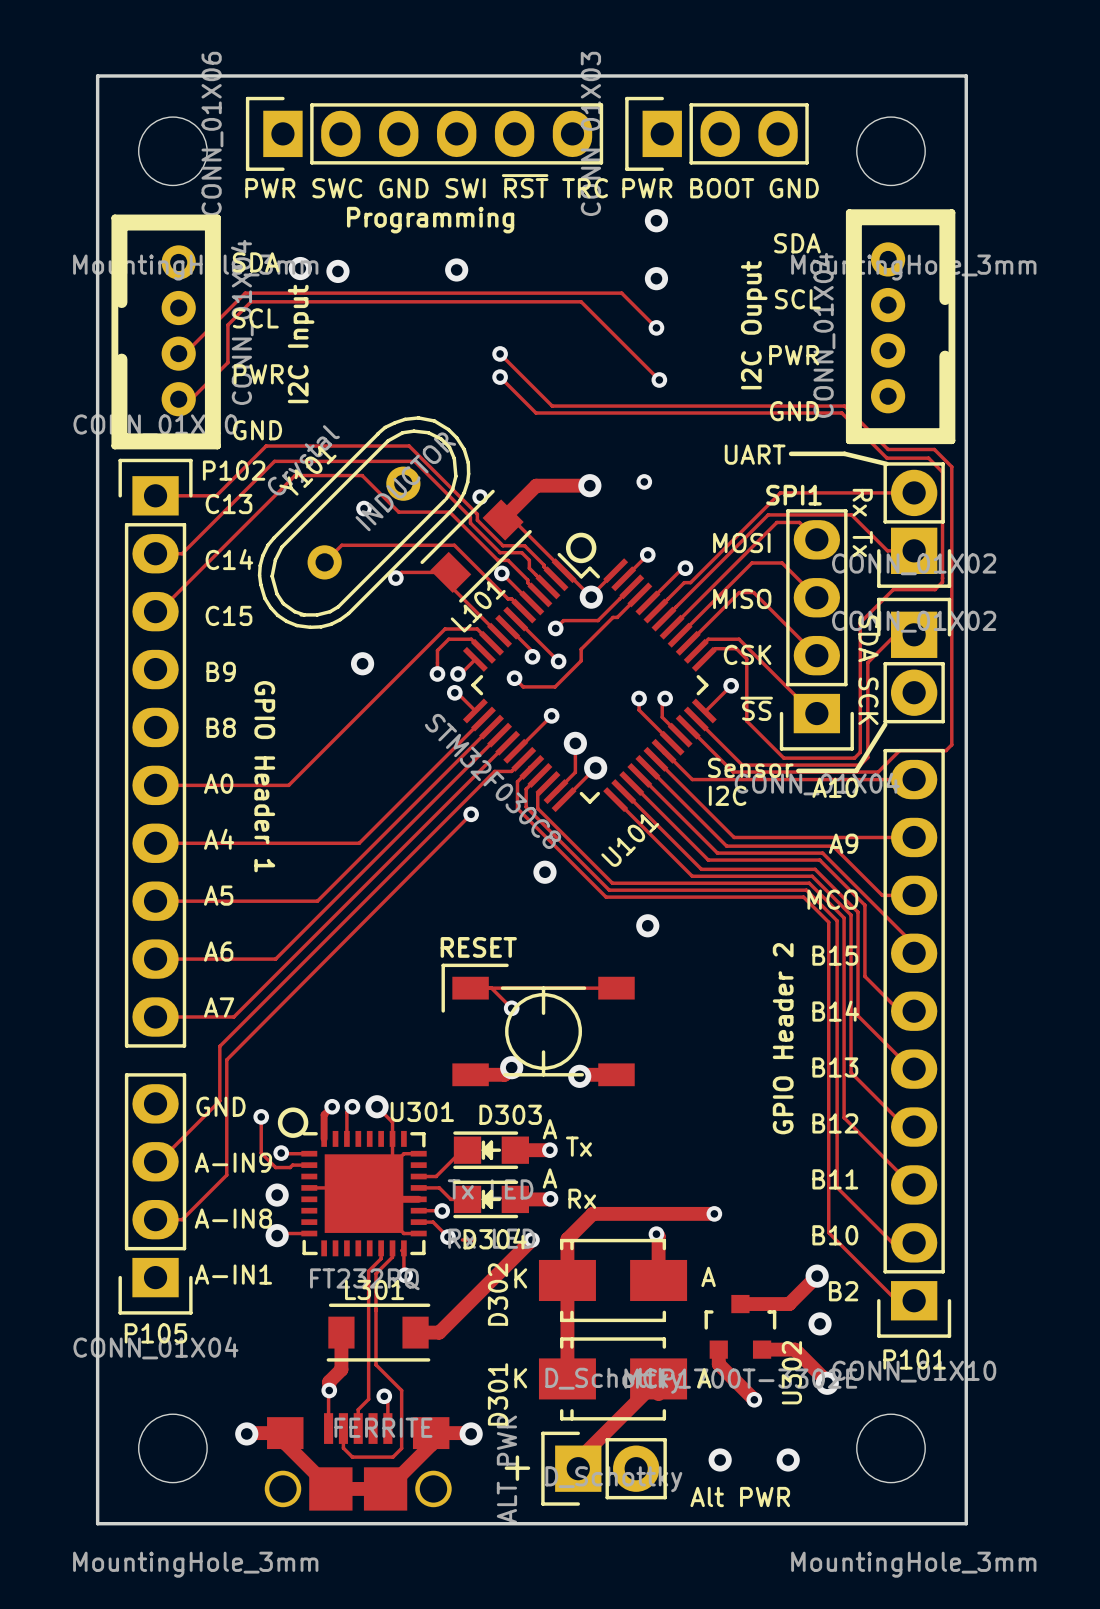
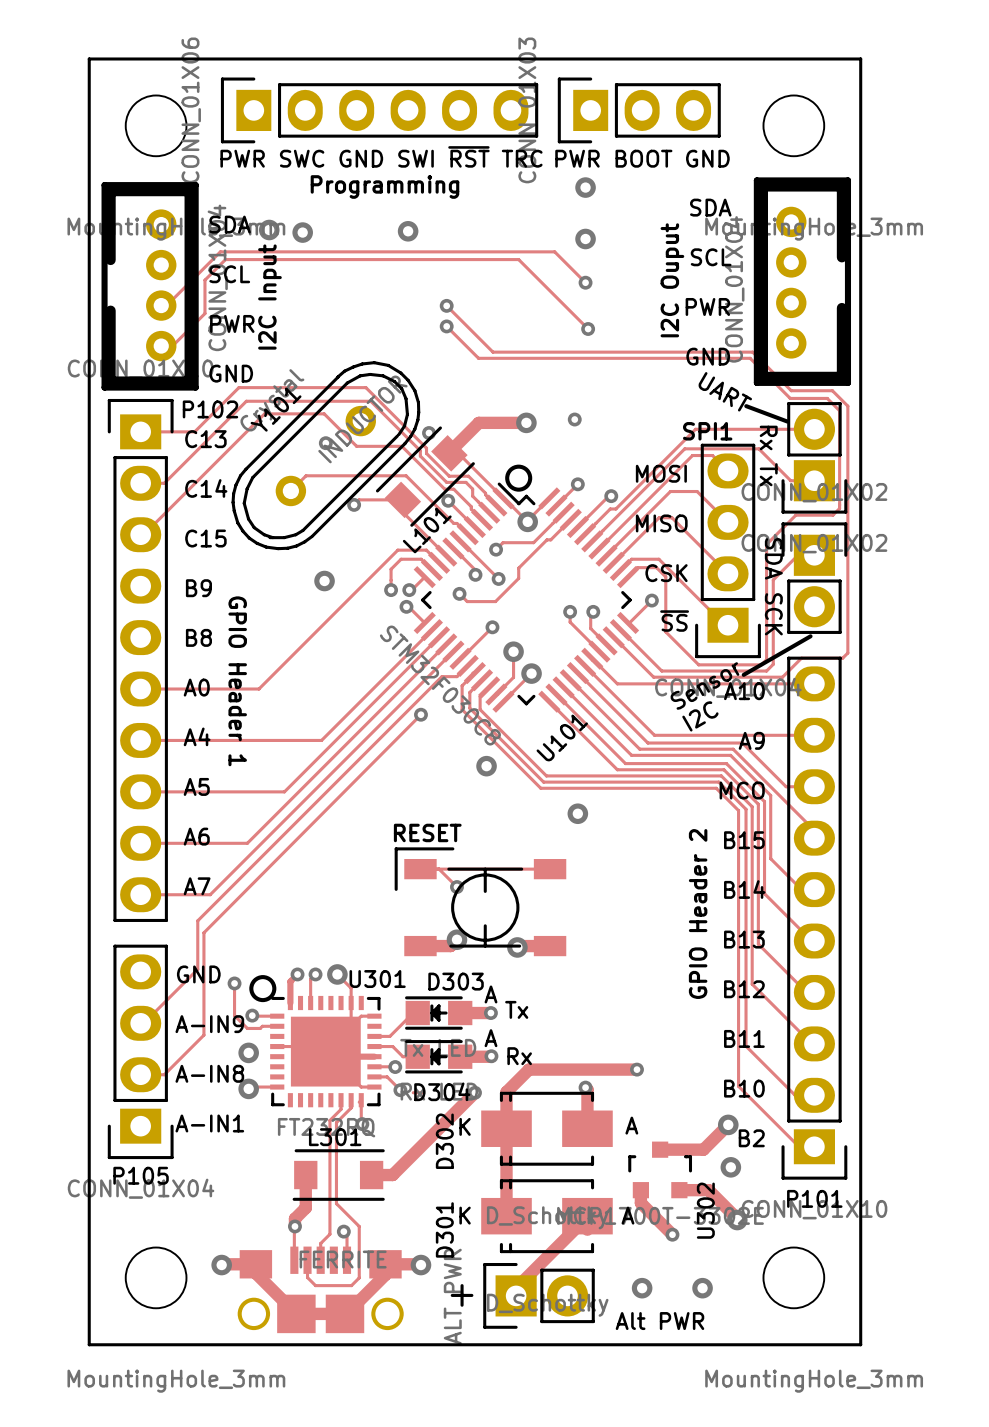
line: (791, 453) (844, 453) (886, 463) -> none
text rotation: 0° (755, 454) -> 30° clockwise (725, 391)
line: none -> (746, 406) (787, 421)
line: (885, 724) (856, 770) (798, 770) -> none
line: none -> (810, 636) (743, 674)
text rotation: 0° (750, 767) -> 30° counterclockwise (704, 685)
text rotation: 0° (727, 795) -> 30° counterclockwise (700, 716)
text position: I2C (727, 795) -> I2C (700, 716)

